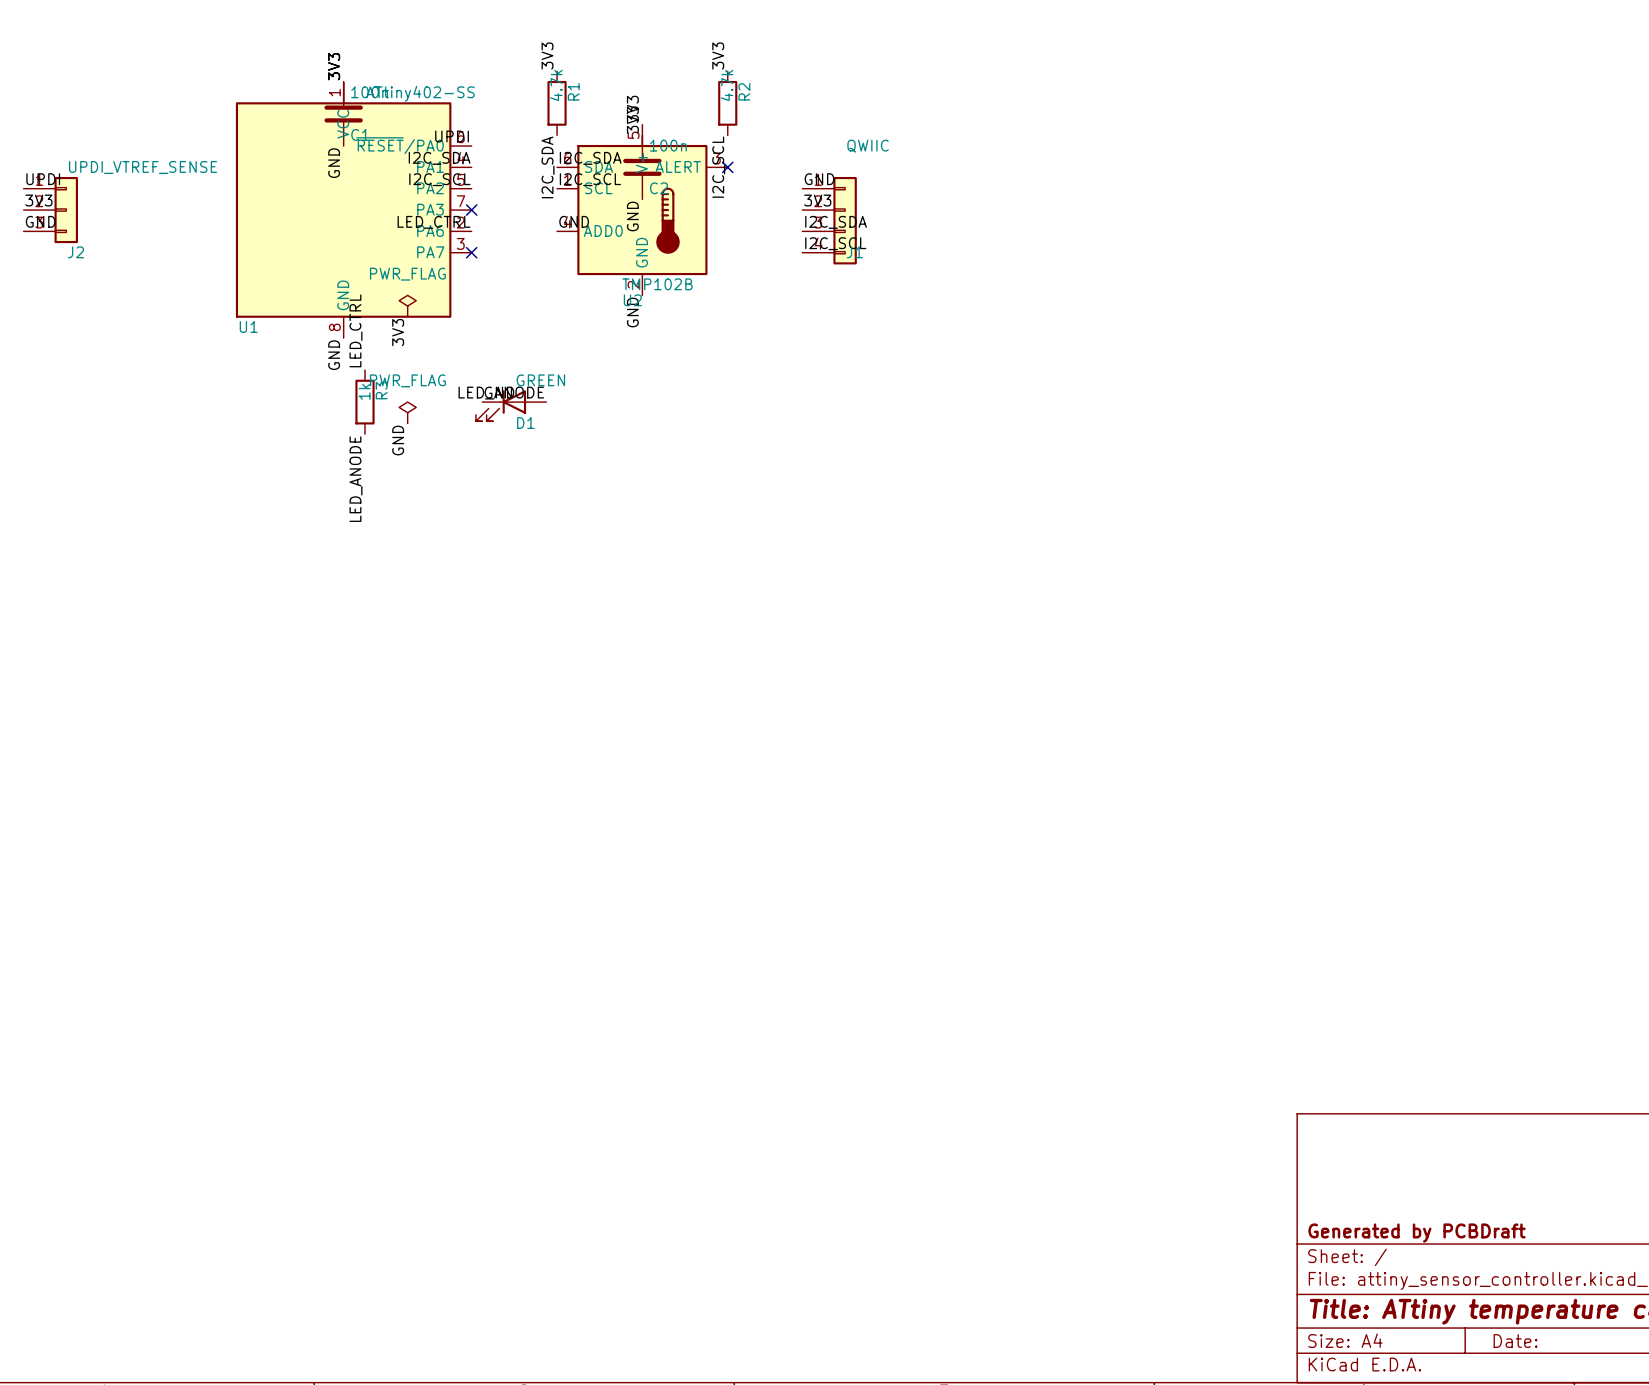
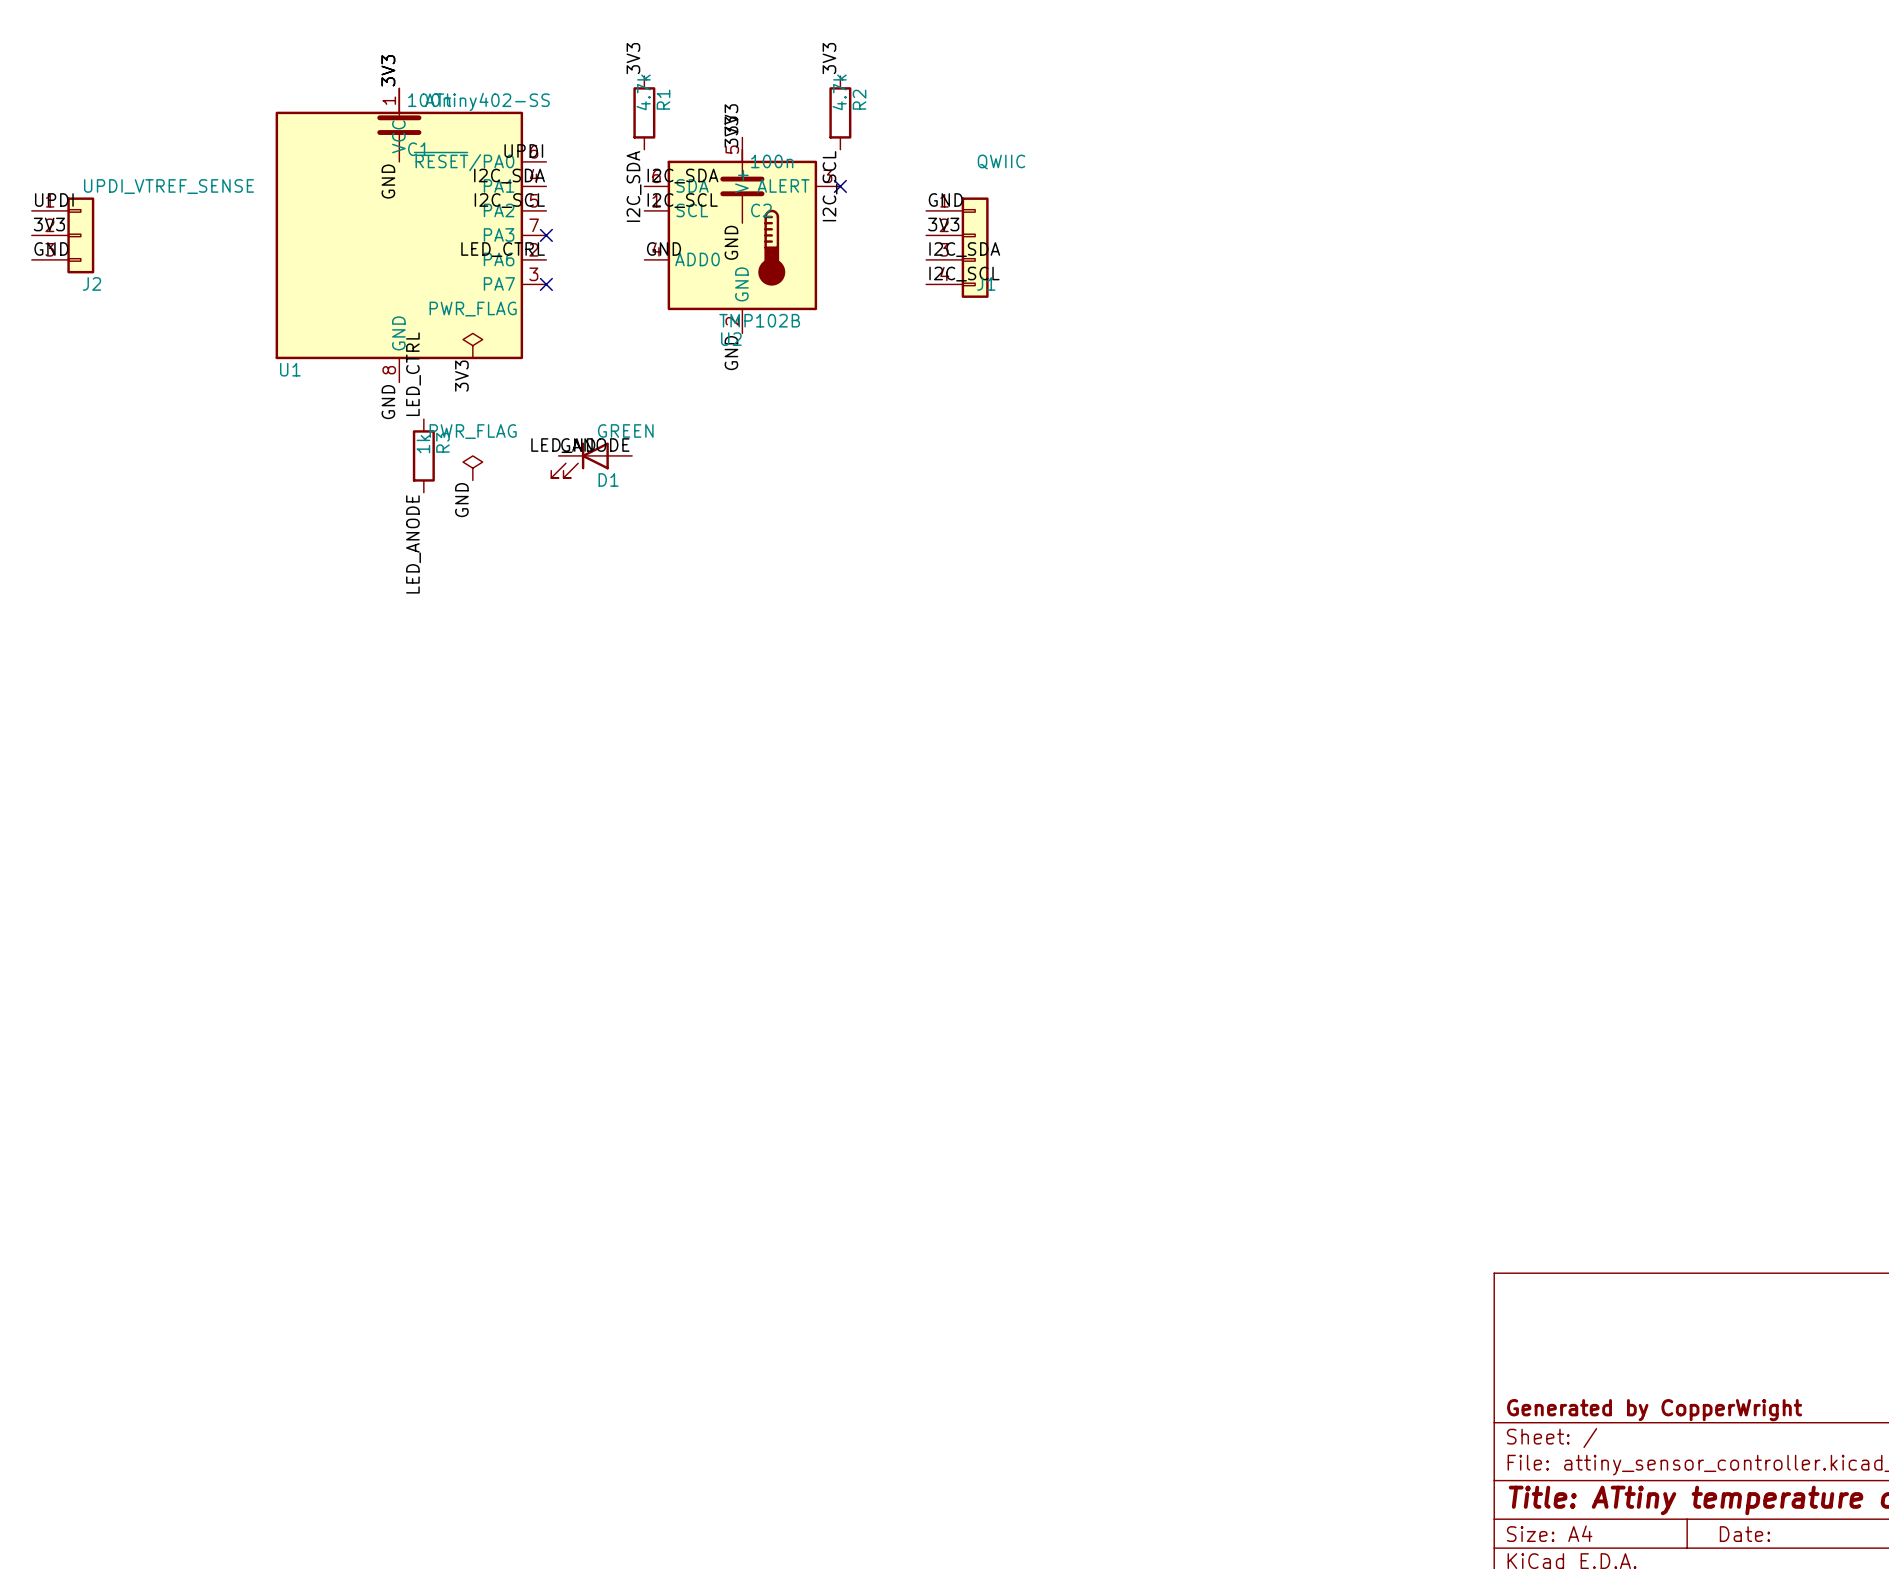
title block: Generated by PCBDraft (1417, 1233) -> Generated by CopperWright (1654, 1410)

